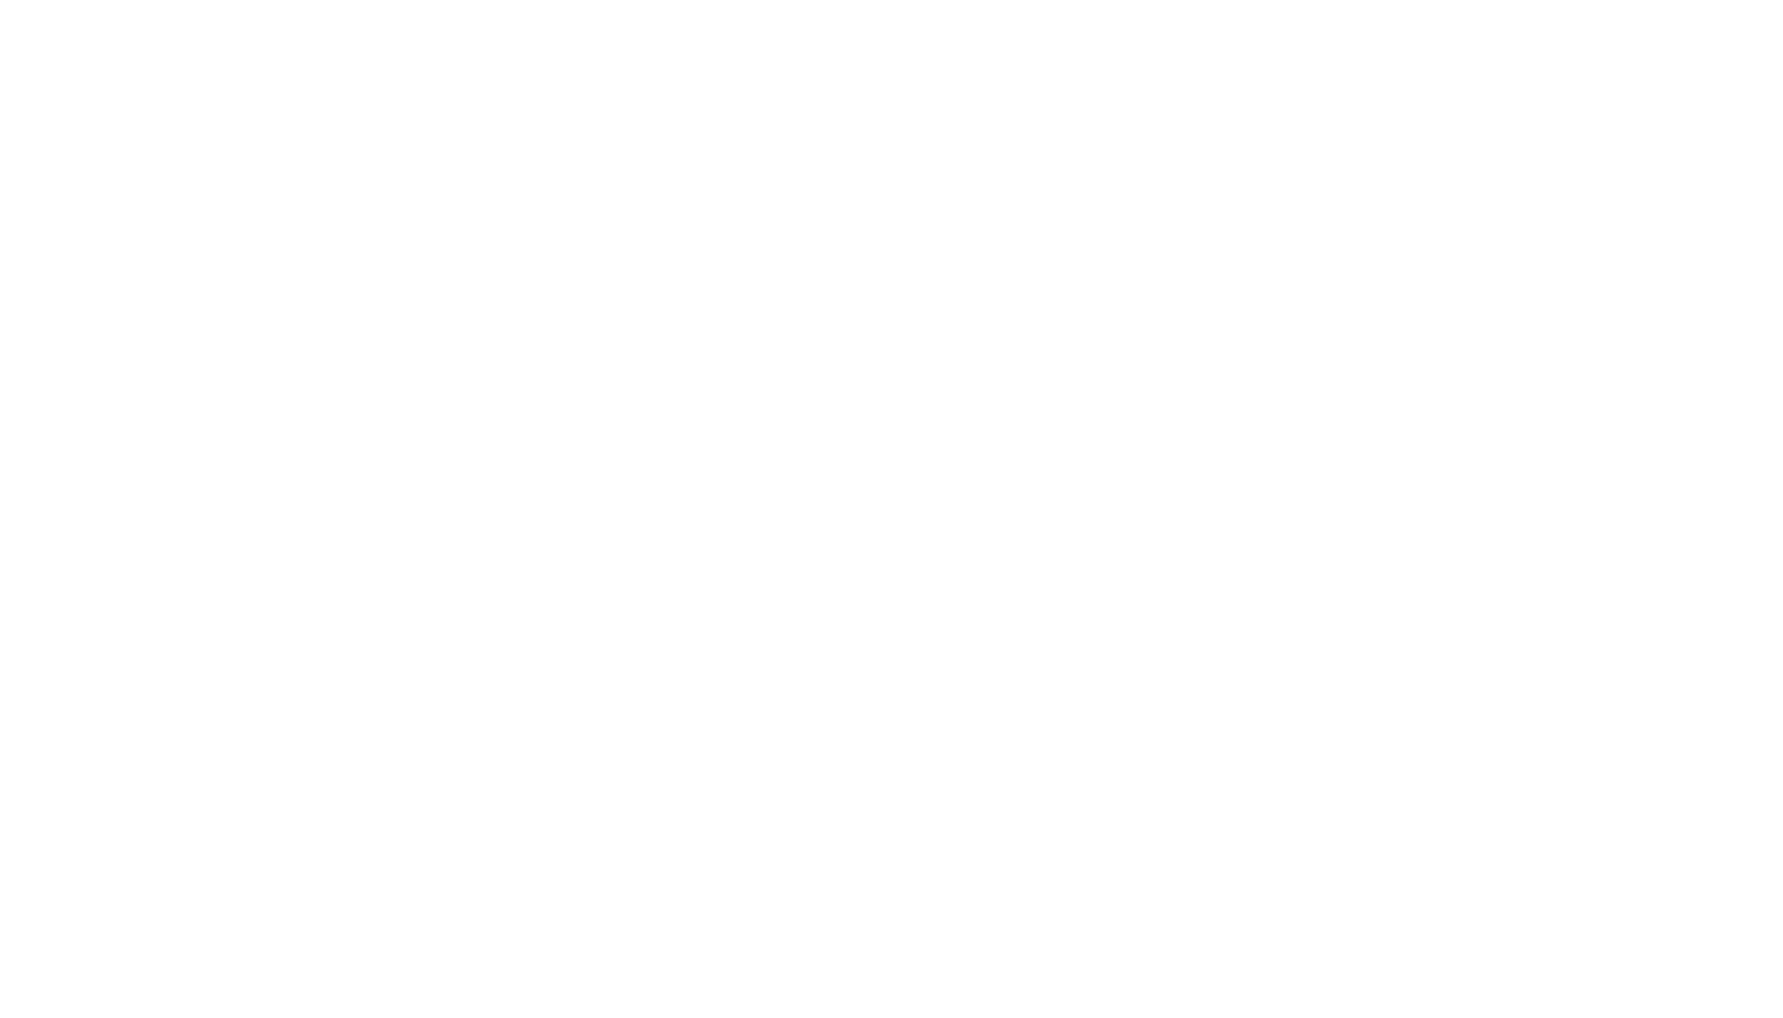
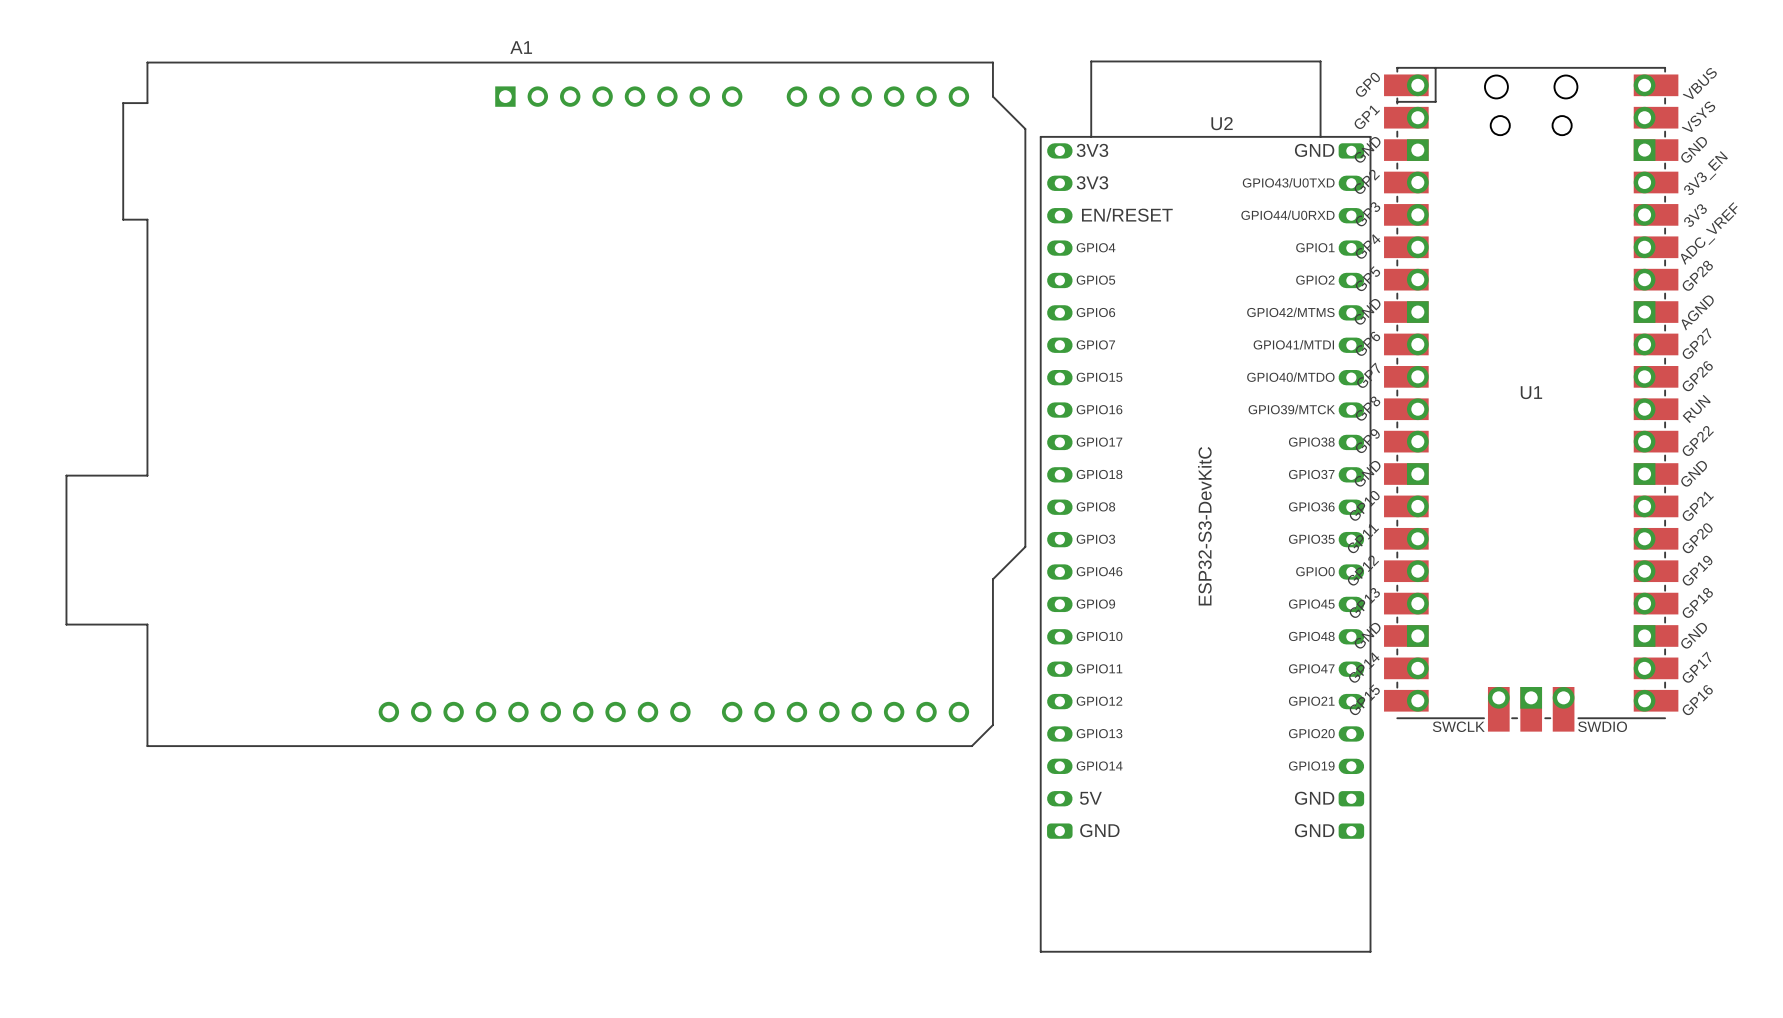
U1: none -> (1531, 399)
A1: none -> (545, 404)
U2: none -> ESP32-S3-DevKitC (1205, 506)

